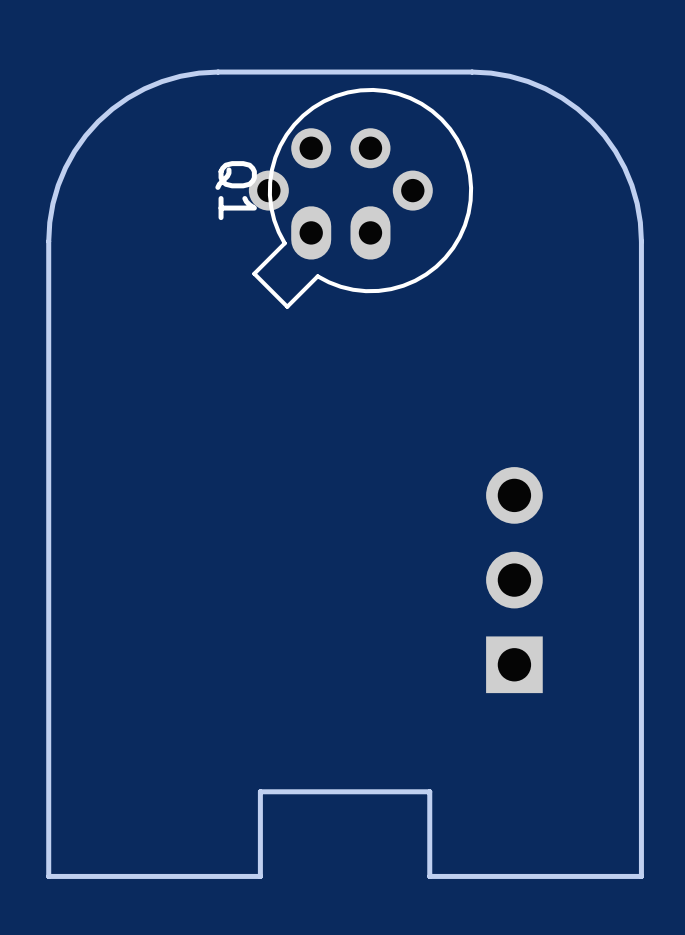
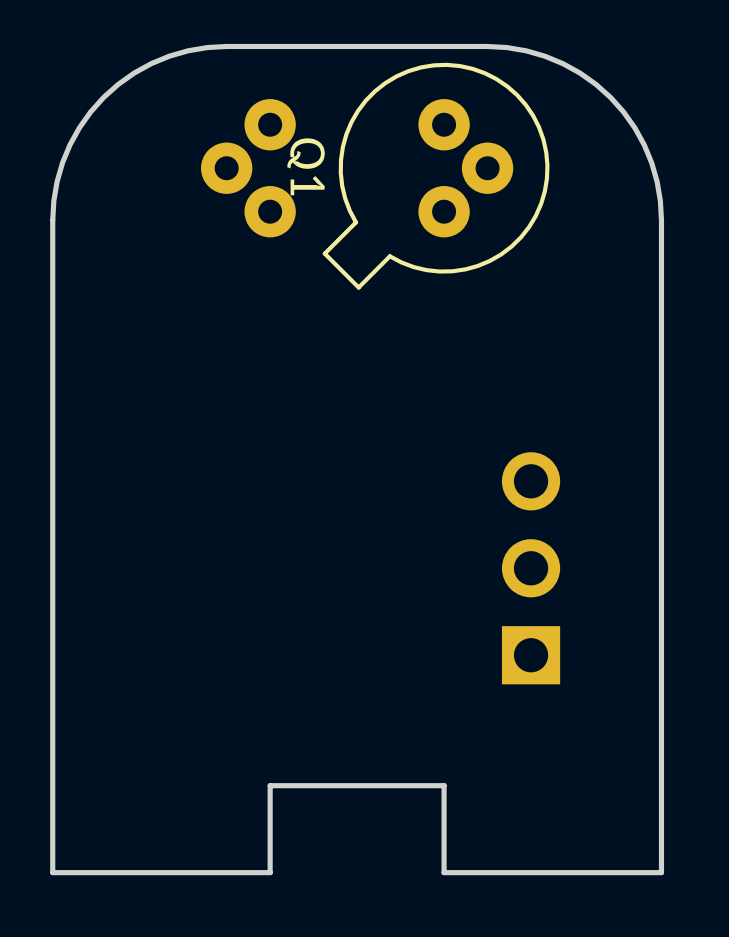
Q1 footprint: [252, 87, 474, 309] -> [322, 62, 550, 290]
part: none -> (248, 168)
part: (290, 193) -> none

